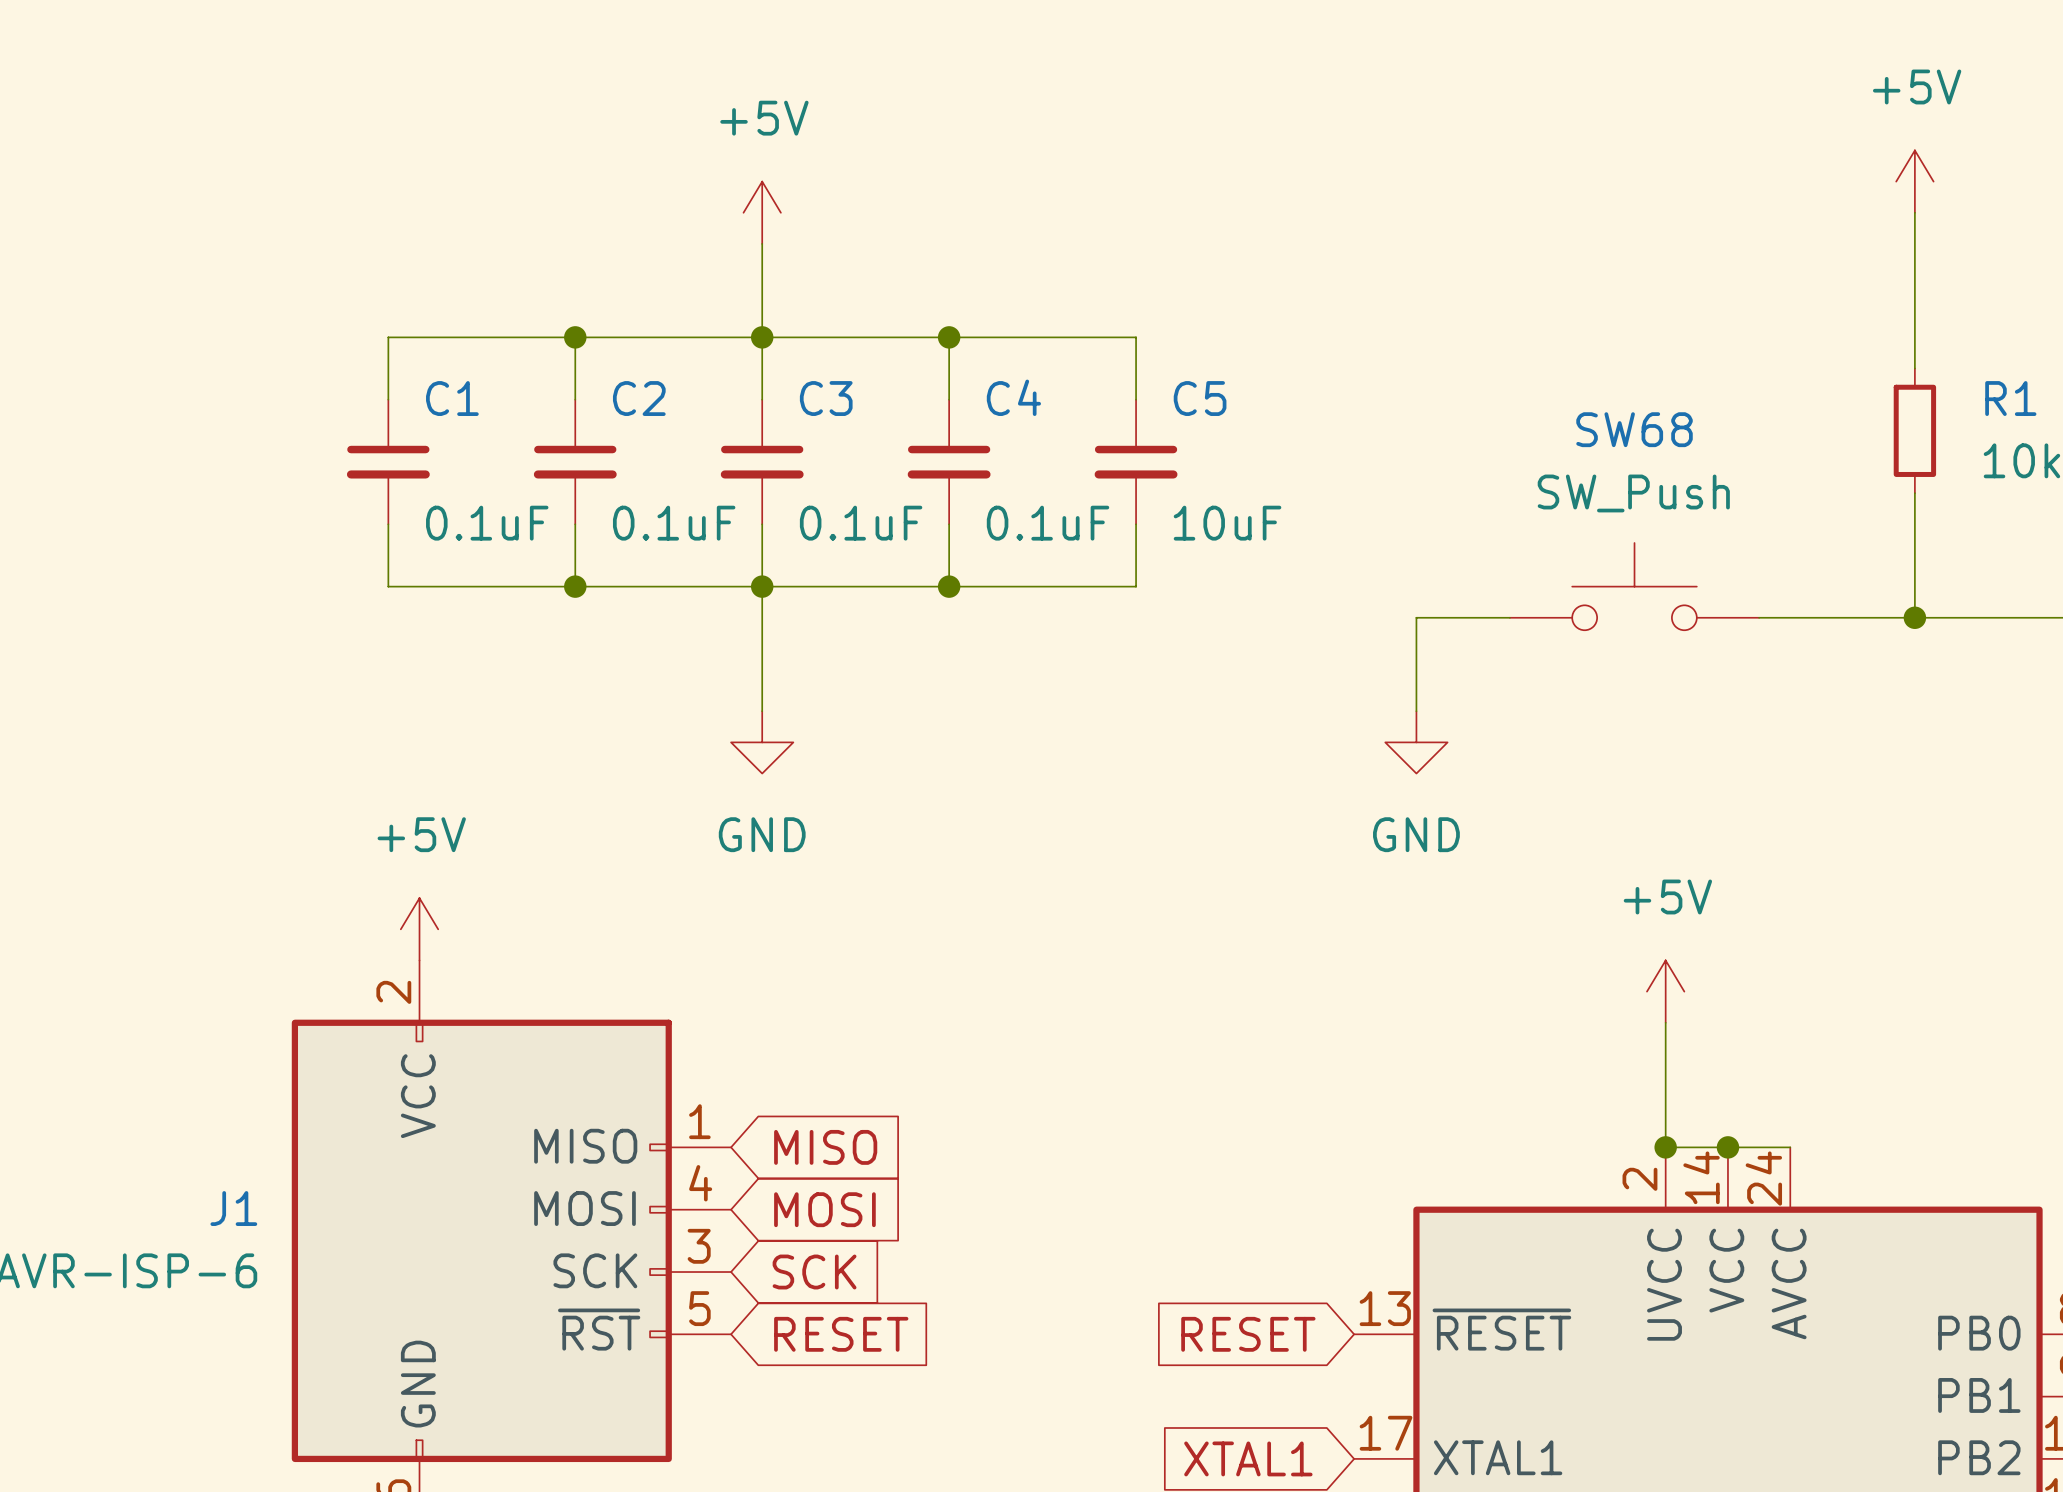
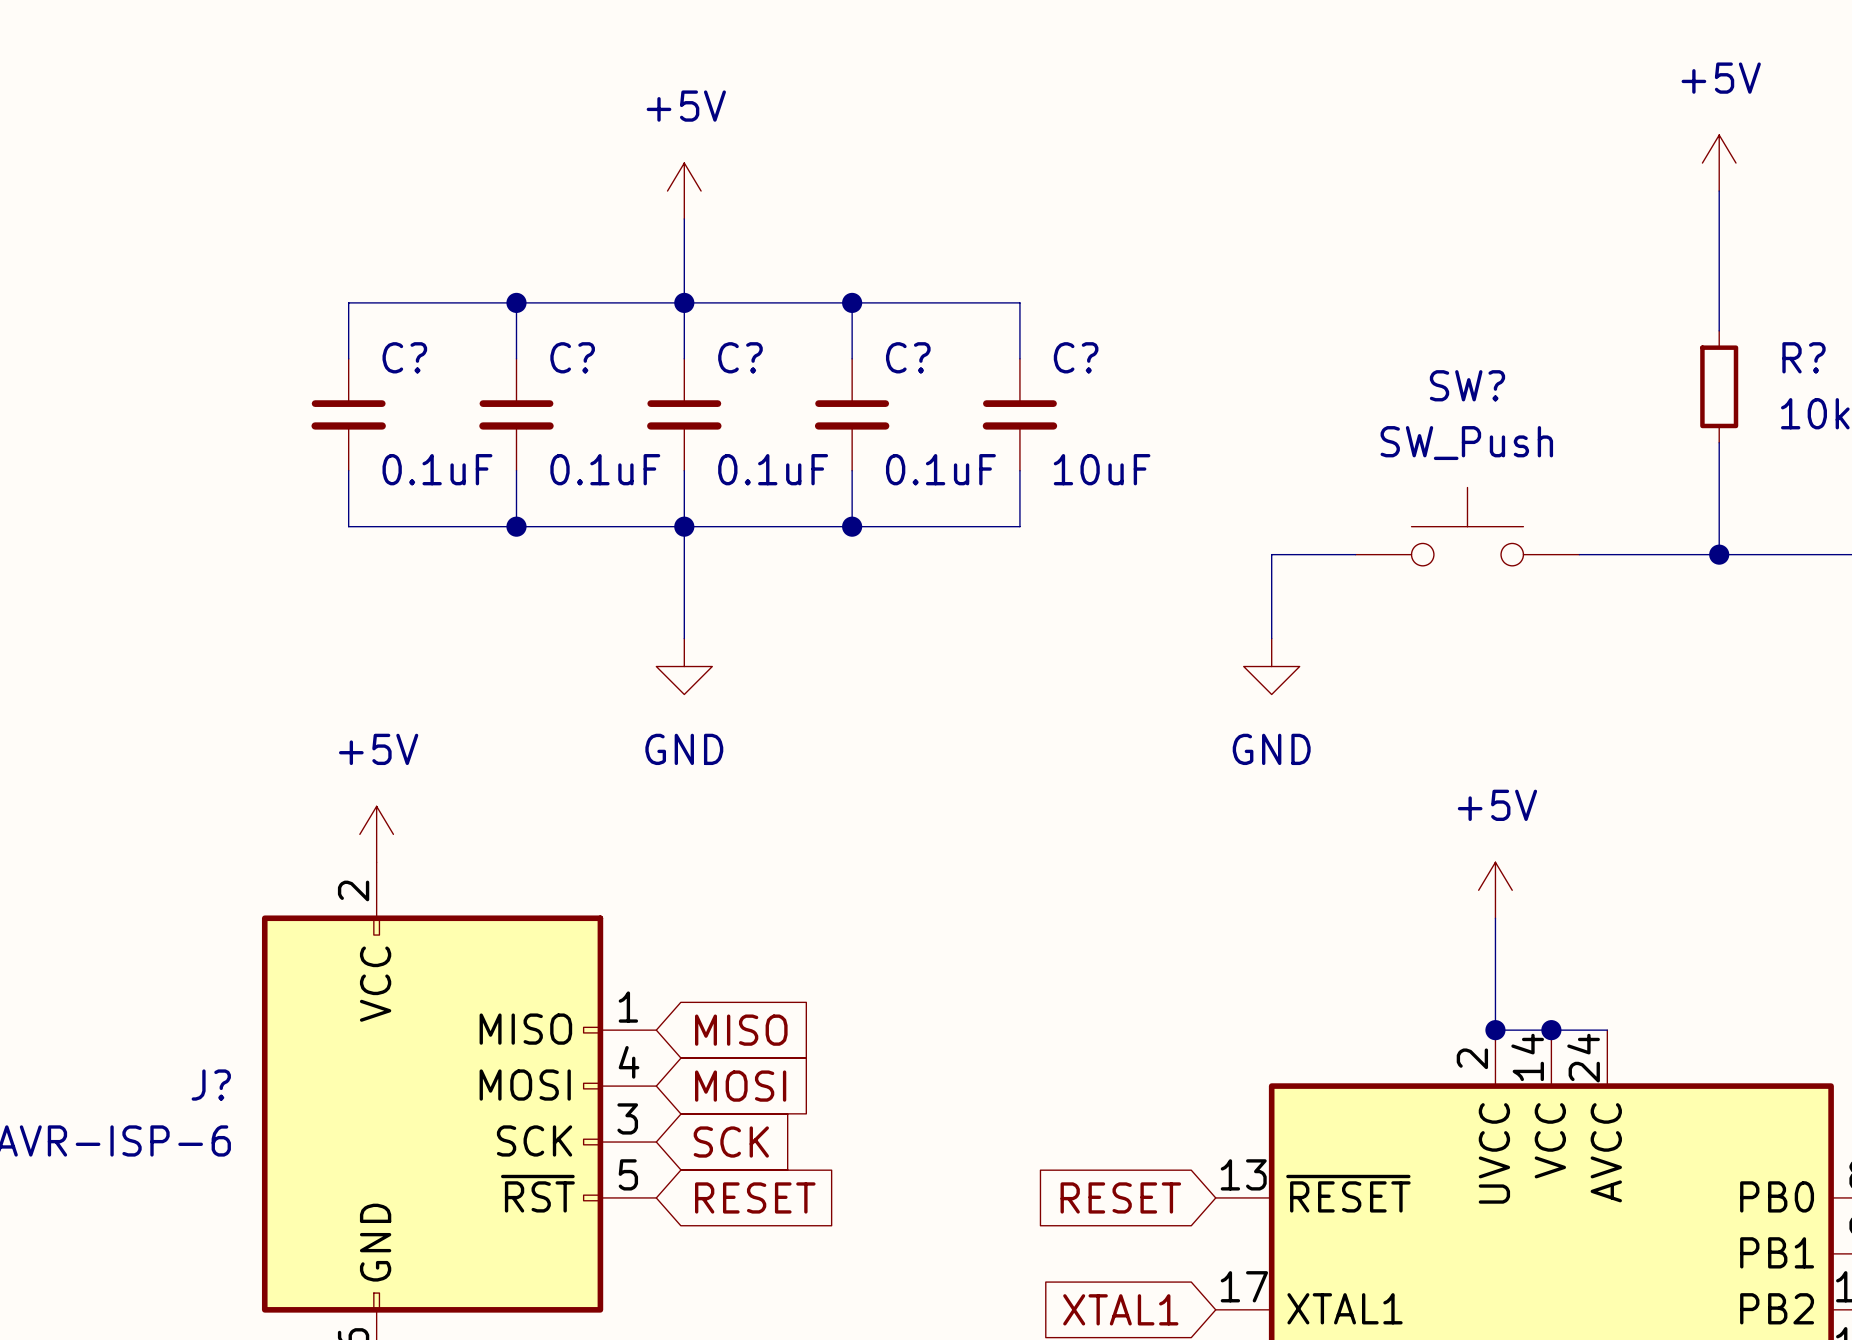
C4 name: C4 (1013, 397) -> C? (908, 357)
C1 name: C1 (452, 398) -> C? (404, 357)
C2 name: C2 (639, 398) -> C? (572, 357)
C3 name: C3 (826, 398) -> C? (740, 357)
C5 name: C5 (1200, 398) -> C? (1076, 357)
R1 name: R1 (2010, 398) -> R? (1804, 357)
SW68 name: SW68 (1634, 429) -> SW? (1467, 385)
J1 name: J1 (233, 1208) -> J? (211, 1085)

